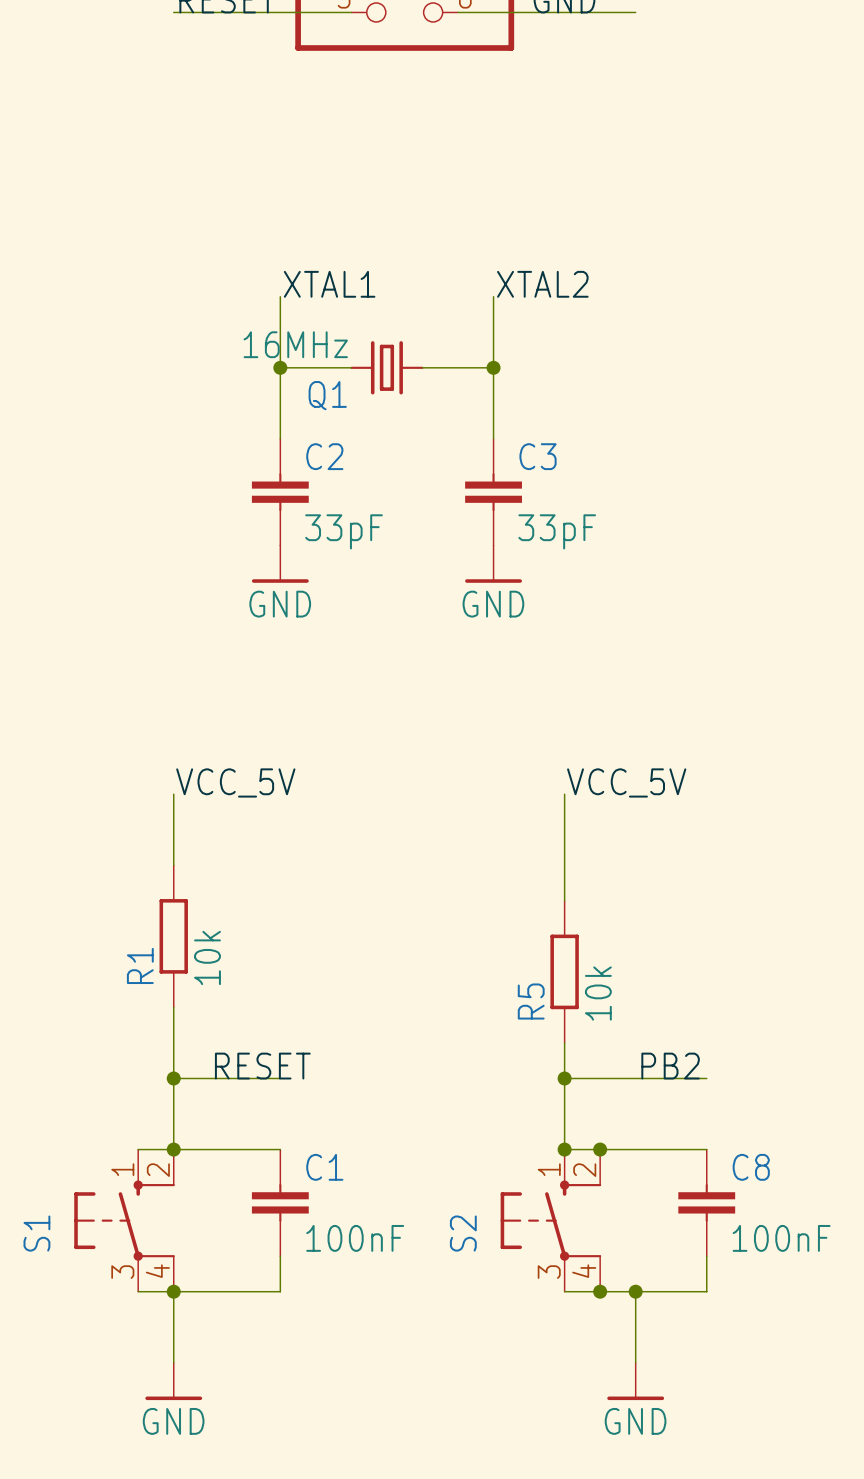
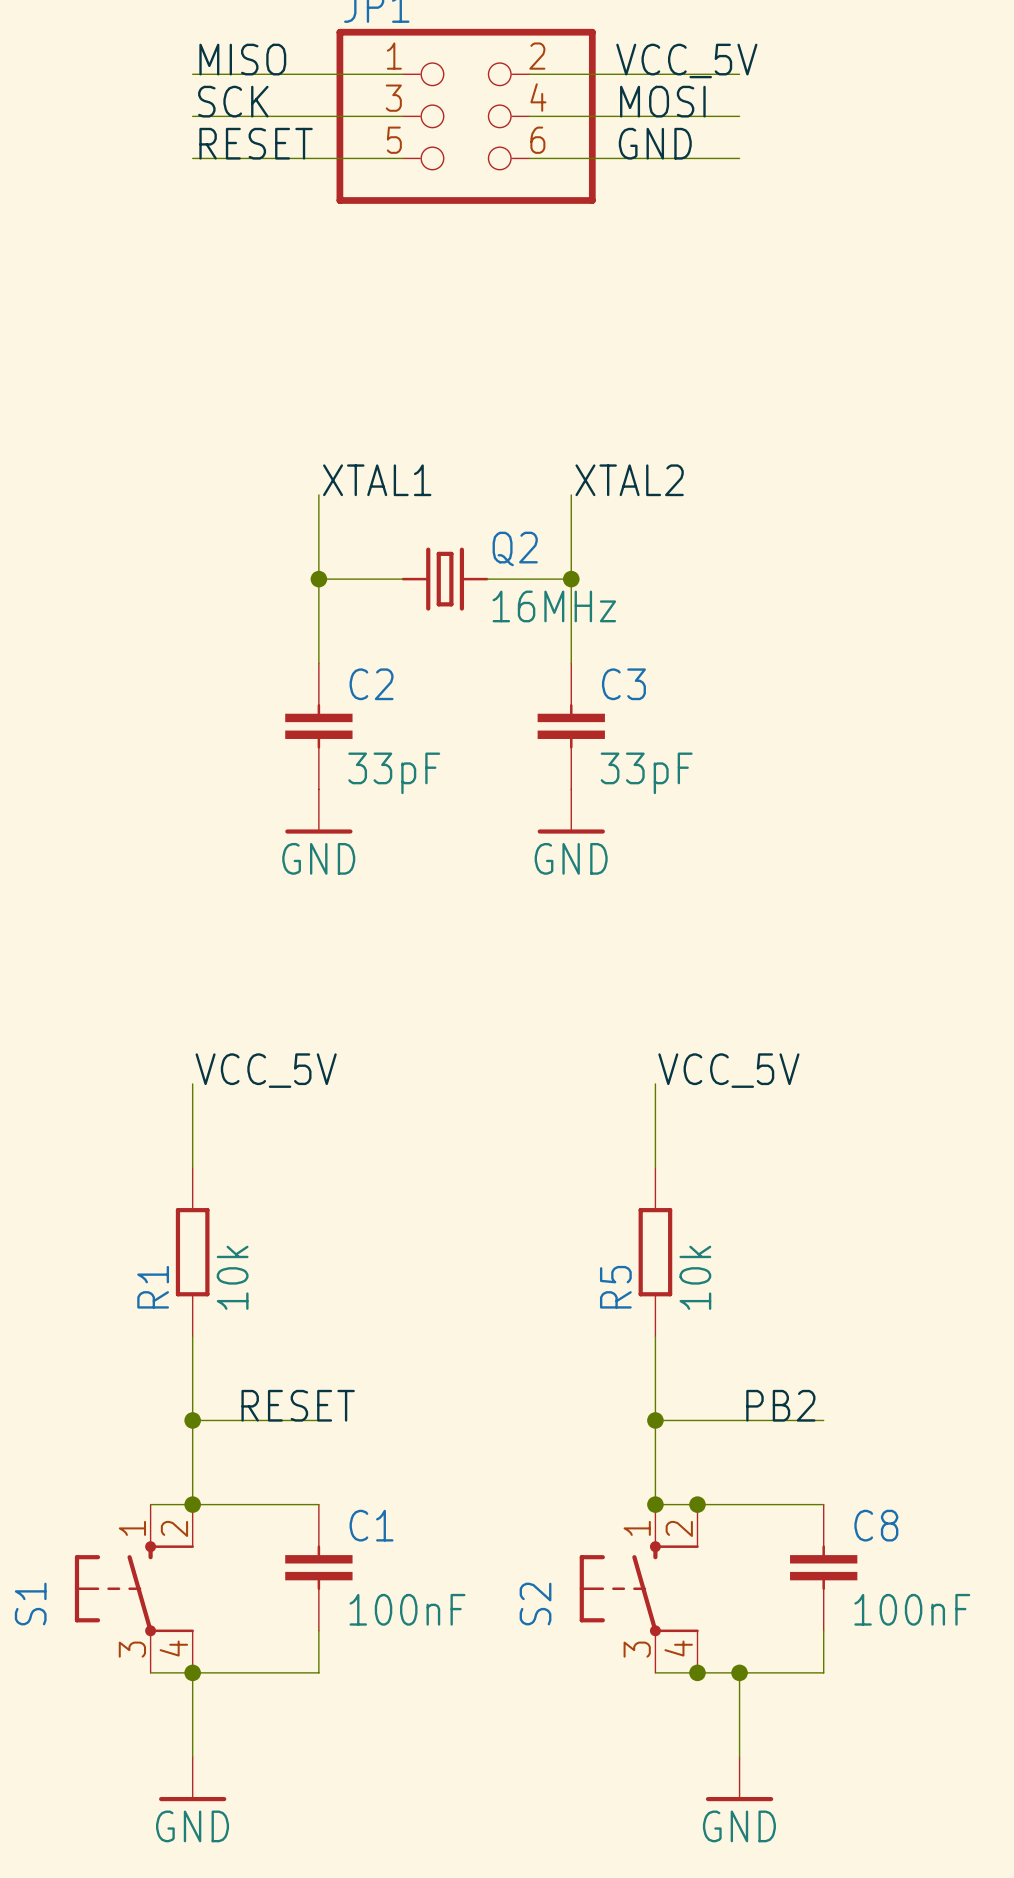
Q1 value position: 16MHz (295, 344) -> 16MHz (554, 606)
Q1 name: Q1 (327, 395) -> Q2 (515, 548)
R5 position: (564, 971) -> (655, 1252)

